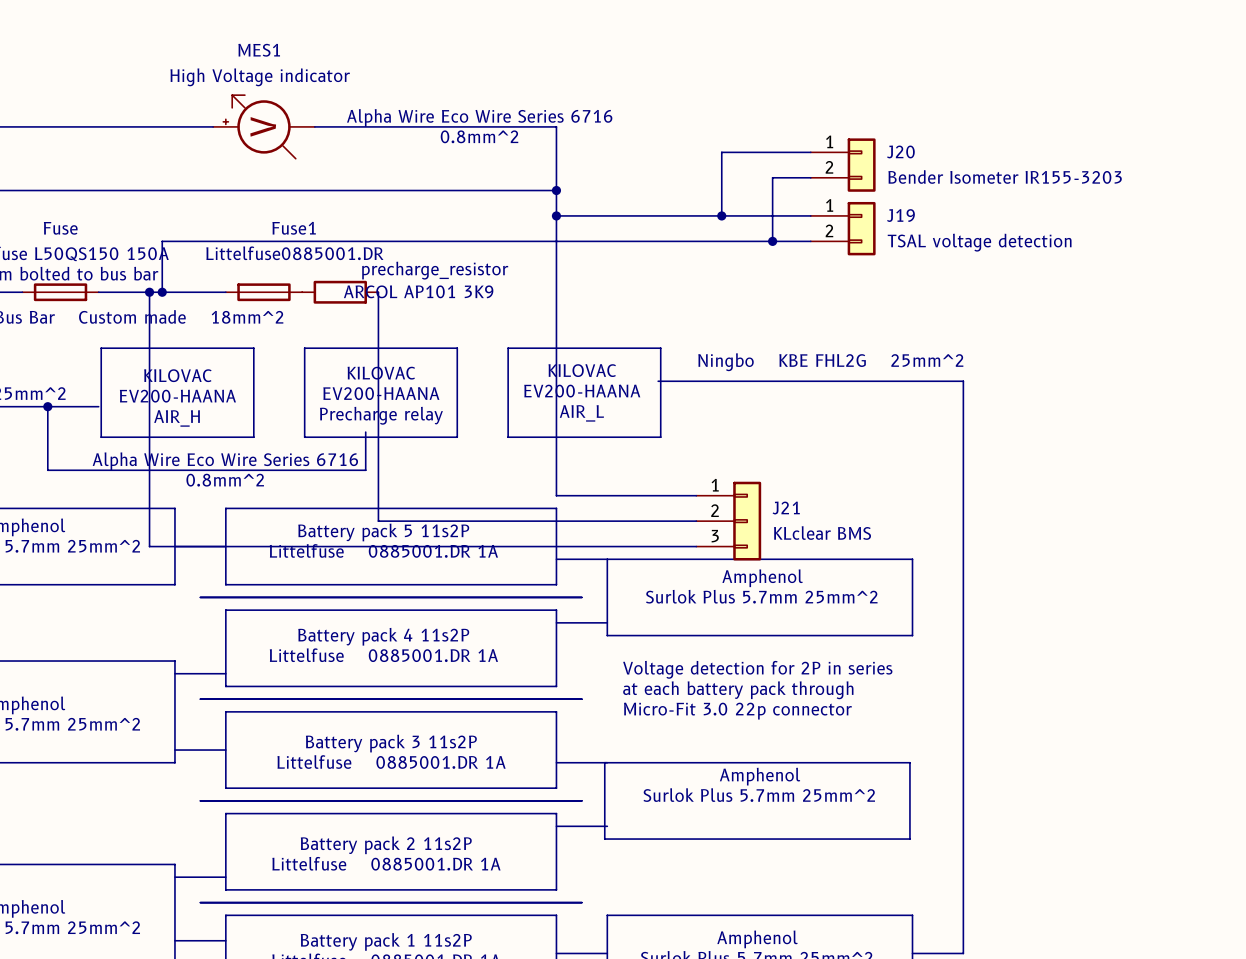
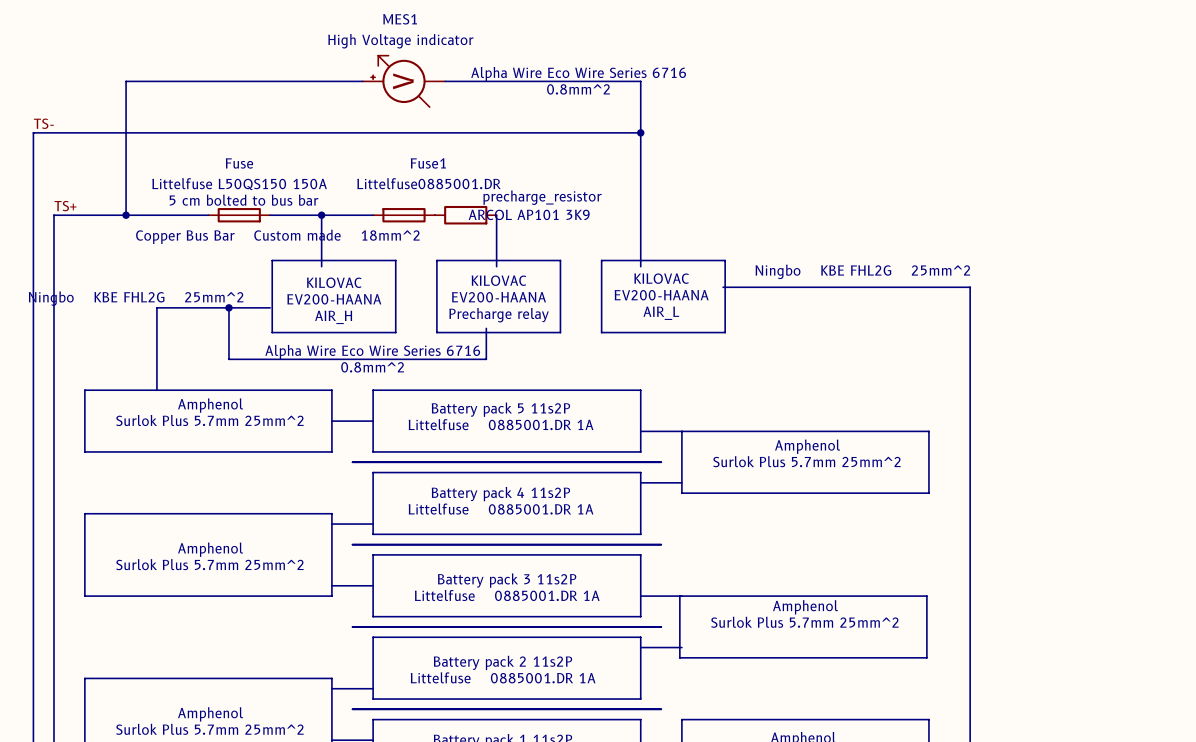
wire: (810, 152) (721, 152) (721, 215) -> none
J20: Bender Isometer IR155-3203 (843, 165) -> none
wire: (810, 177) (772, 177) (772, 241) -> none
wire: (556, 215) (810, 215) -> none
junction: (556, 215) -> none
junction: (721, 215) -> none
J19: TSAL voltage detection (843, 228) -> none
junction: (772, 241) -> none
wire: (810, 241) (162, 241) (162, 292) -> (321, 266) (321, 215)
wire: (149, 292) (149, 546) (696, 546) -> none
junction: (149, 292) -> none
wire: (378, 355) (378, 521) (696, 521) -> none
wire: (556, 355) (556, 495) (696, 495) -> none
J21: KLclear BMS (728, 521) -> none
text: Voltage detection for 2P in series (757, 669) -> none
text: at each battery pack through (738, 690) -> none
text: Micro-Fit 3.0 22p connector (737, 711) -> none

